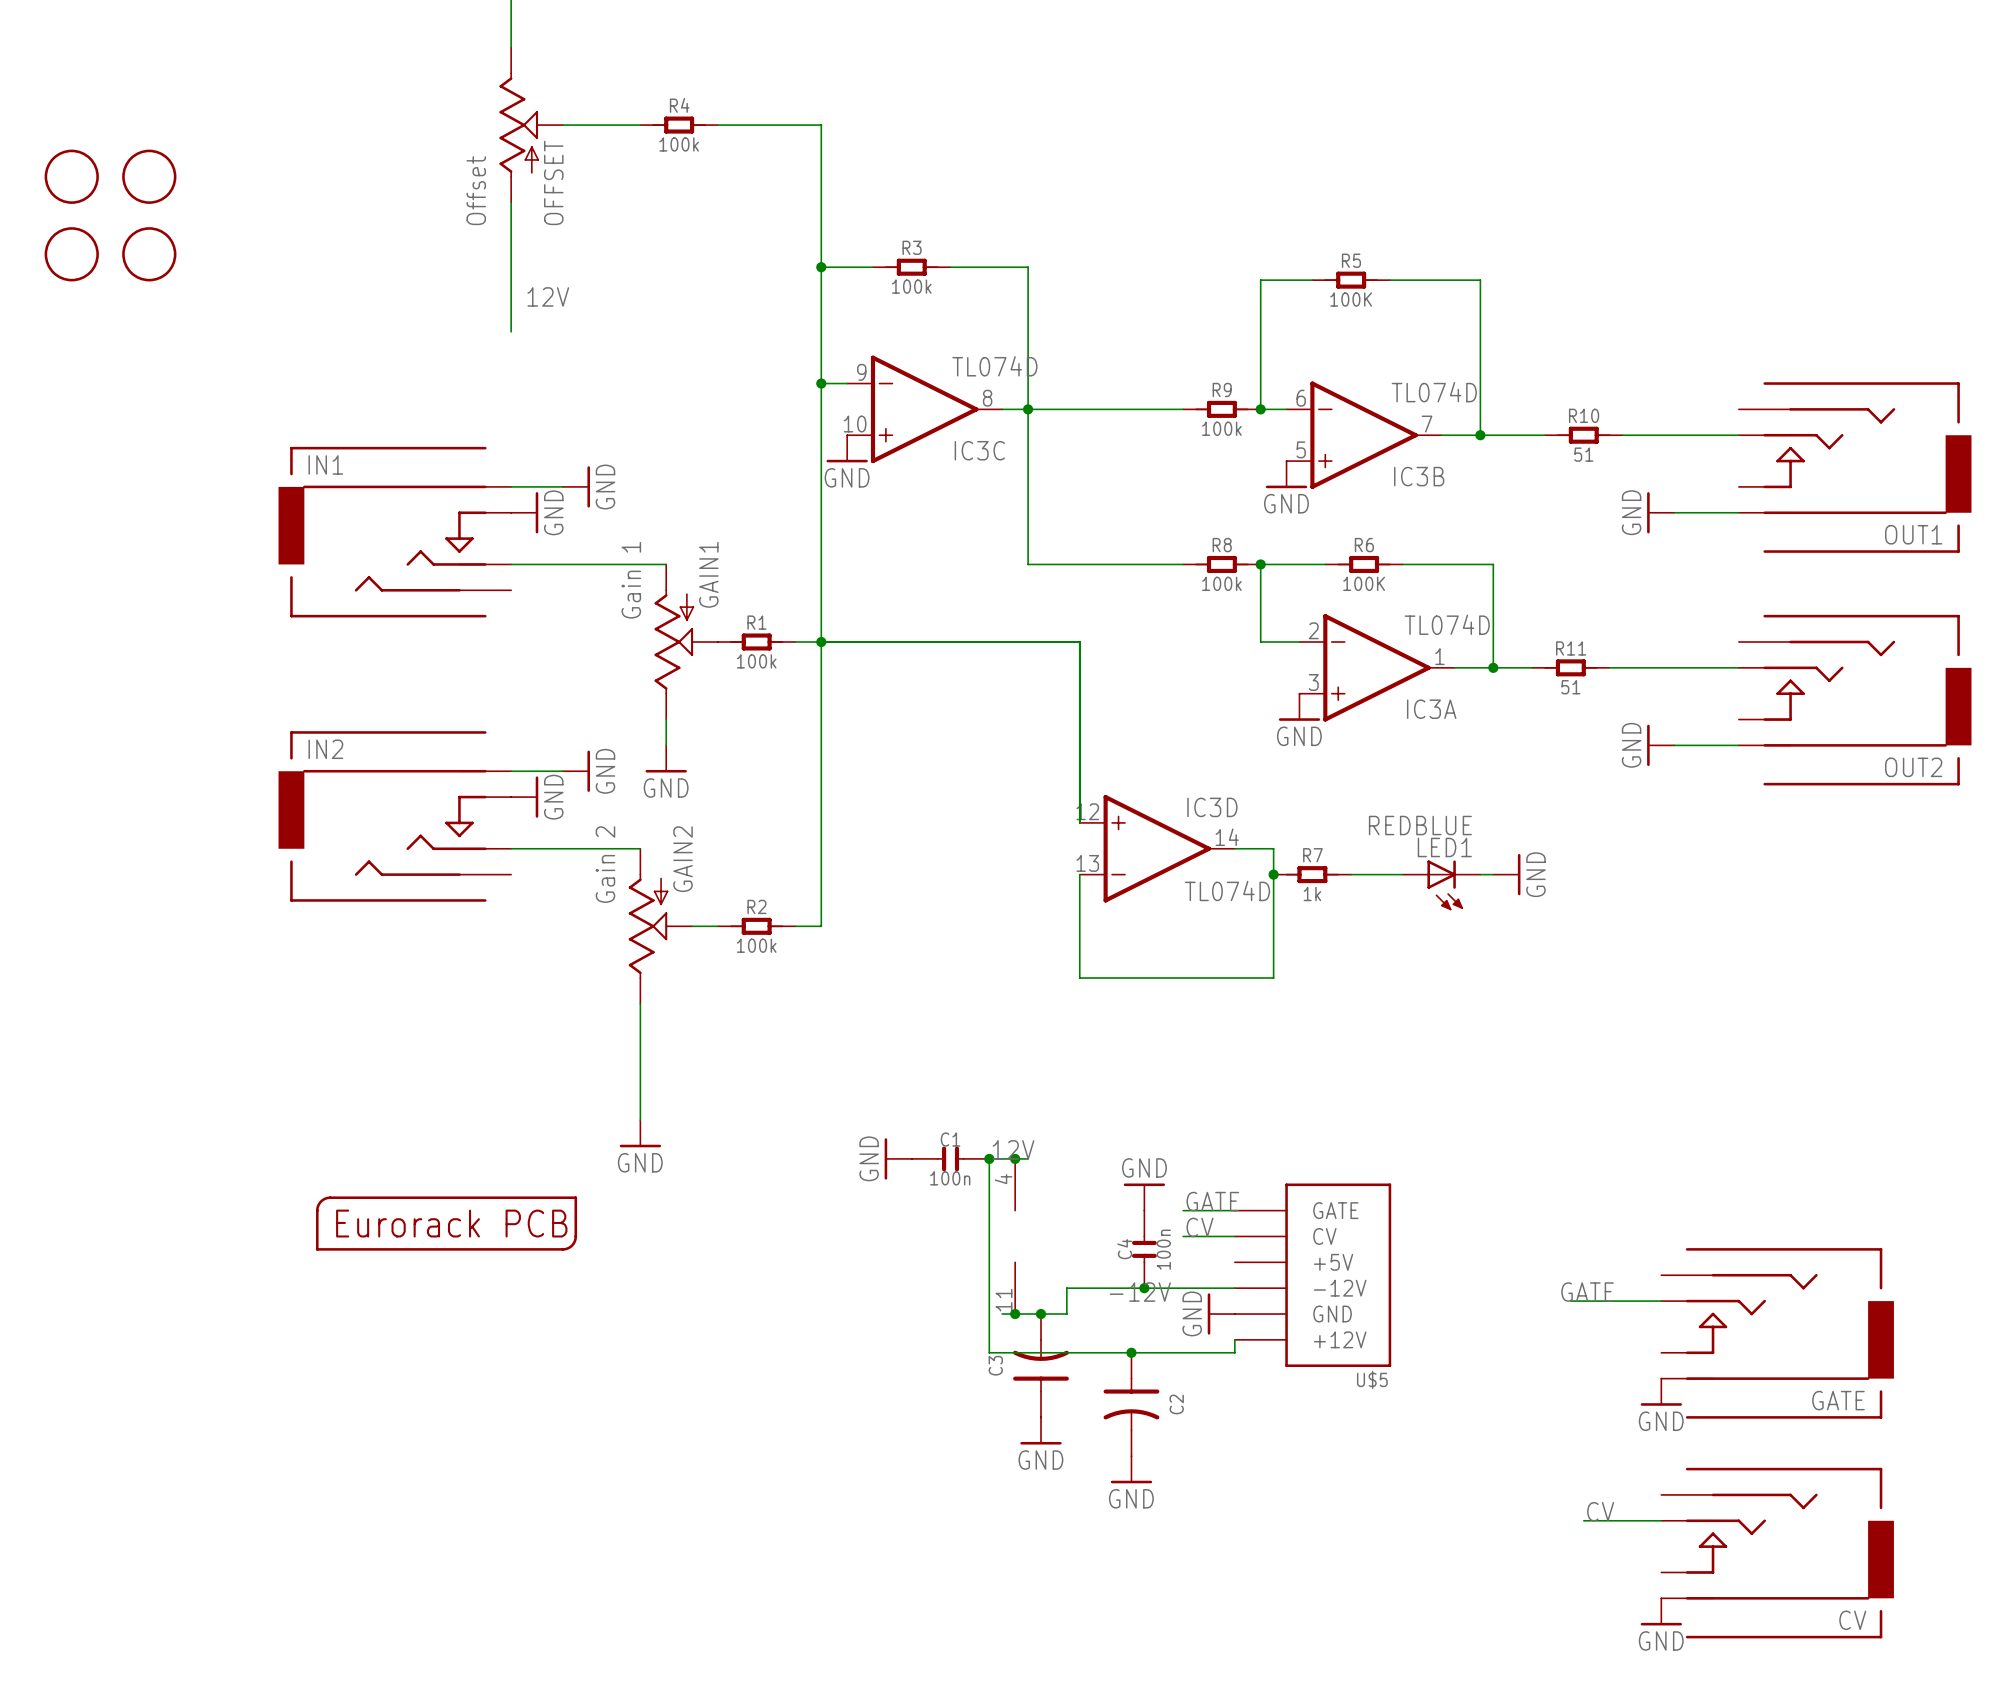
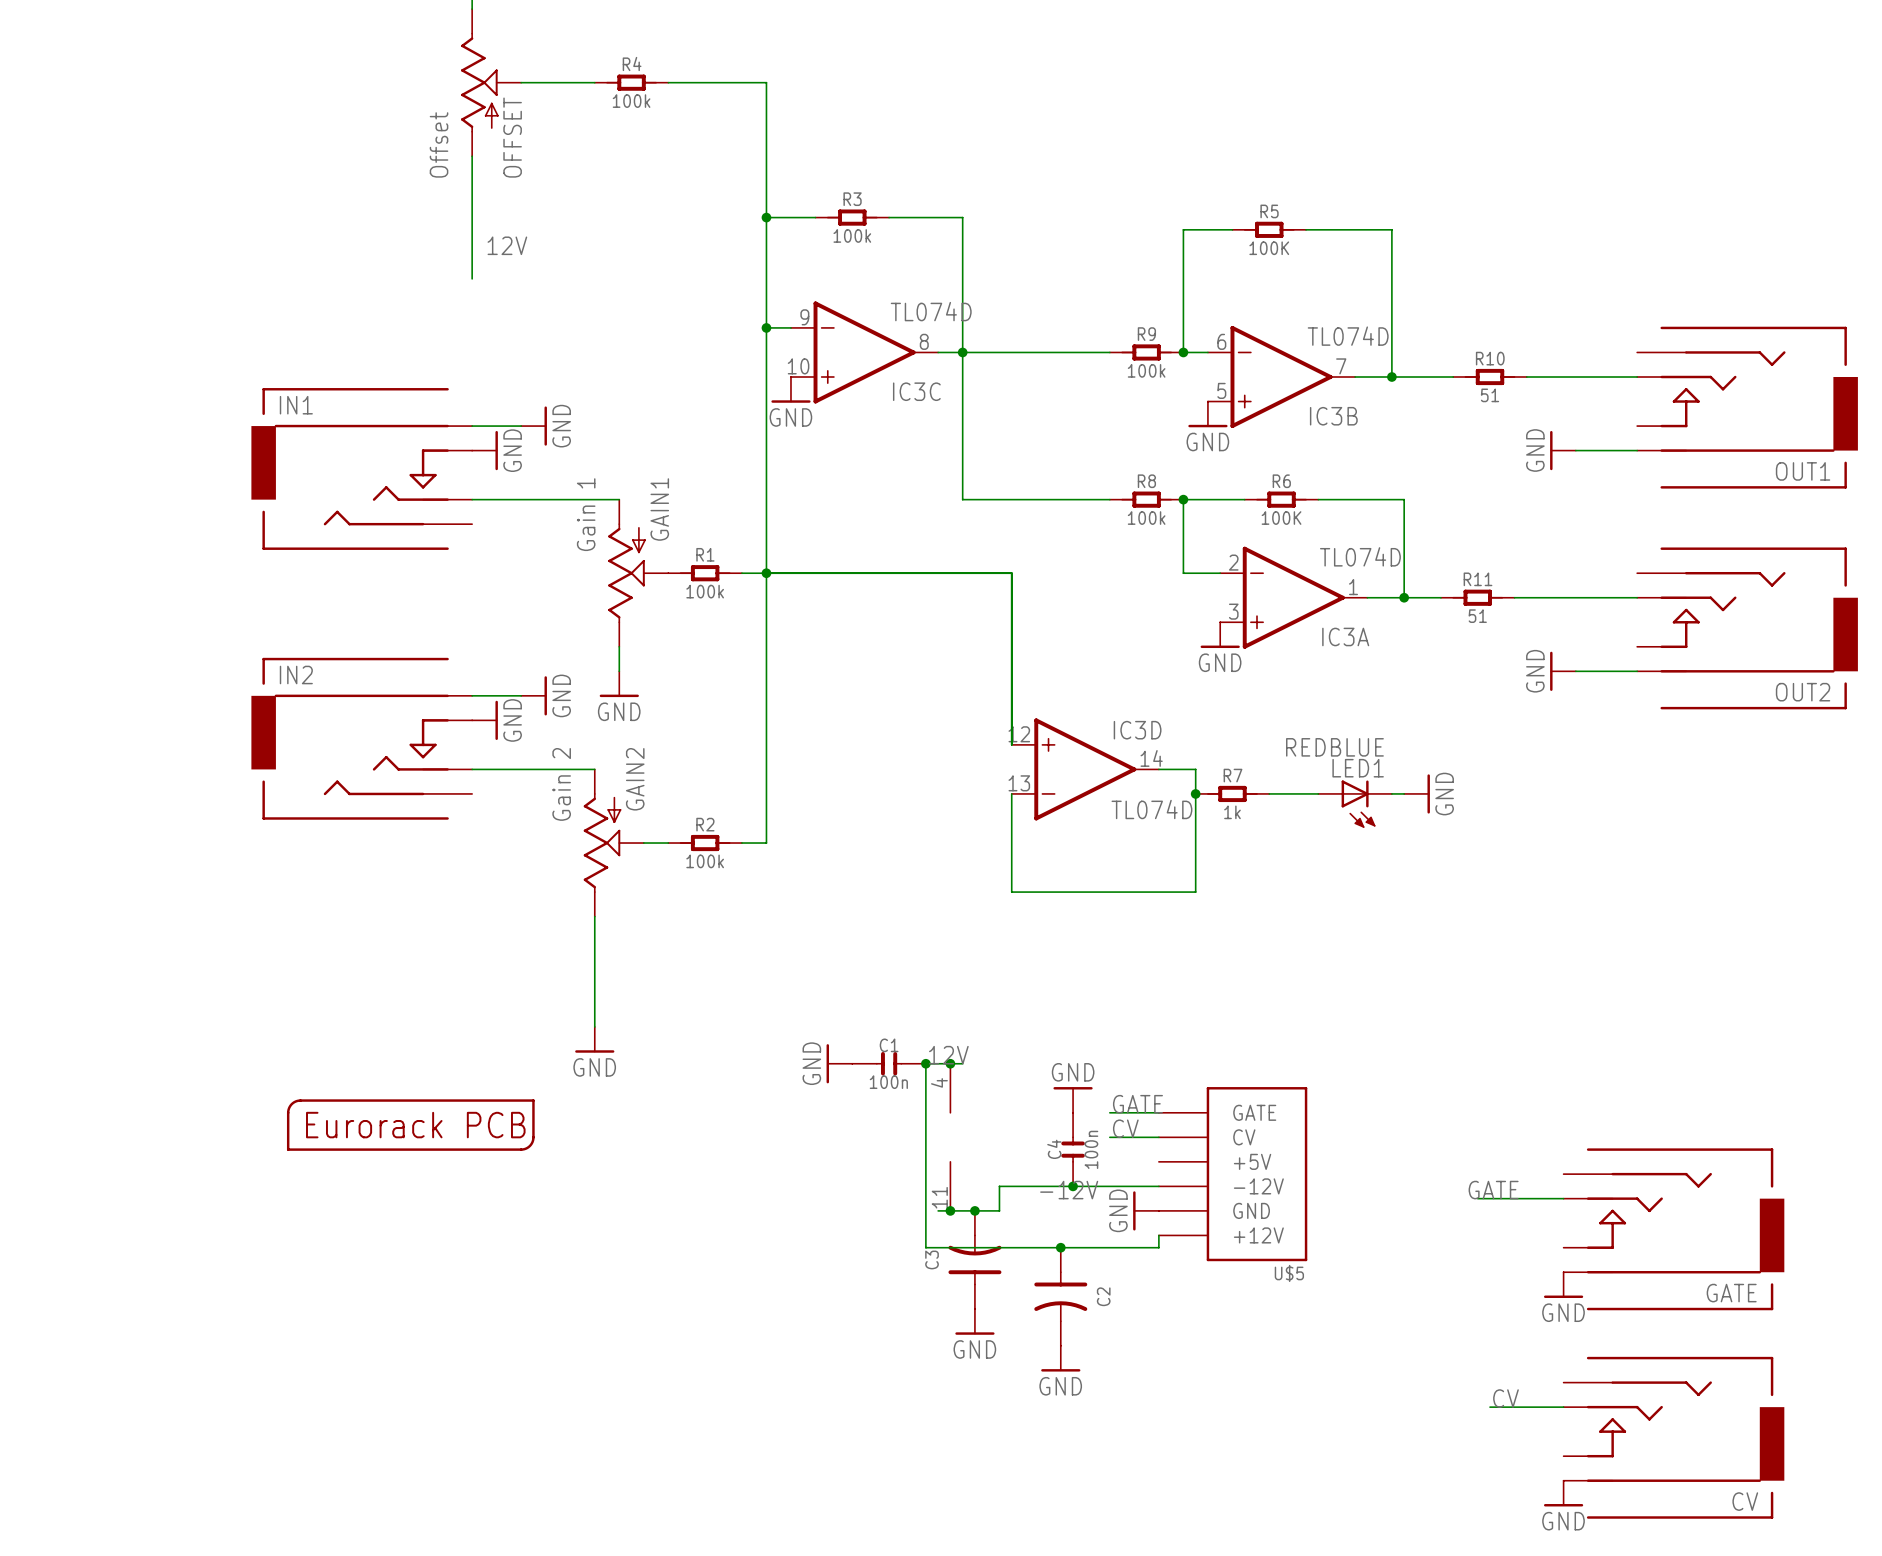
part: (71, 176) -> none
part: (149, 176) -> none
part: (71, 254) -> none
part: (149, 254) -> none

